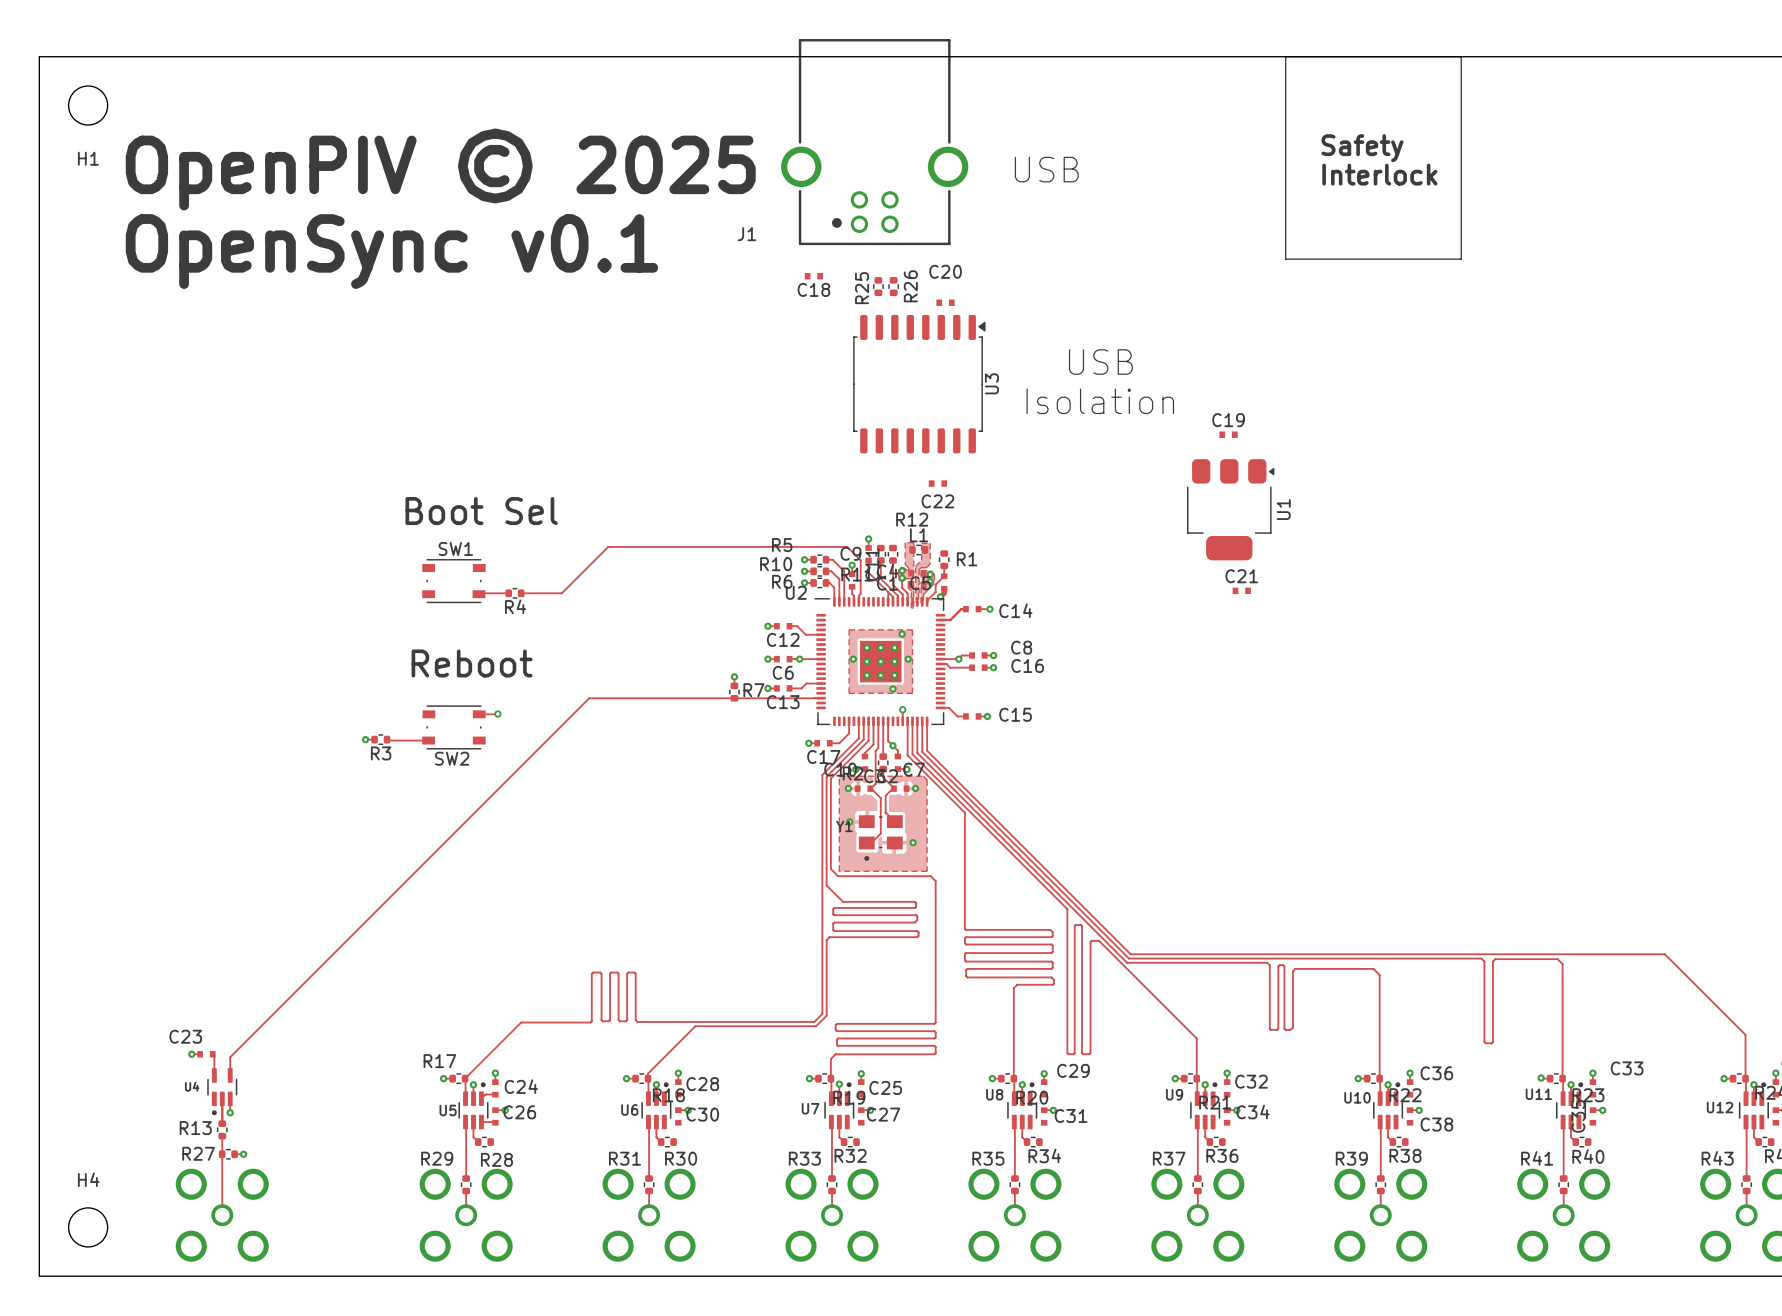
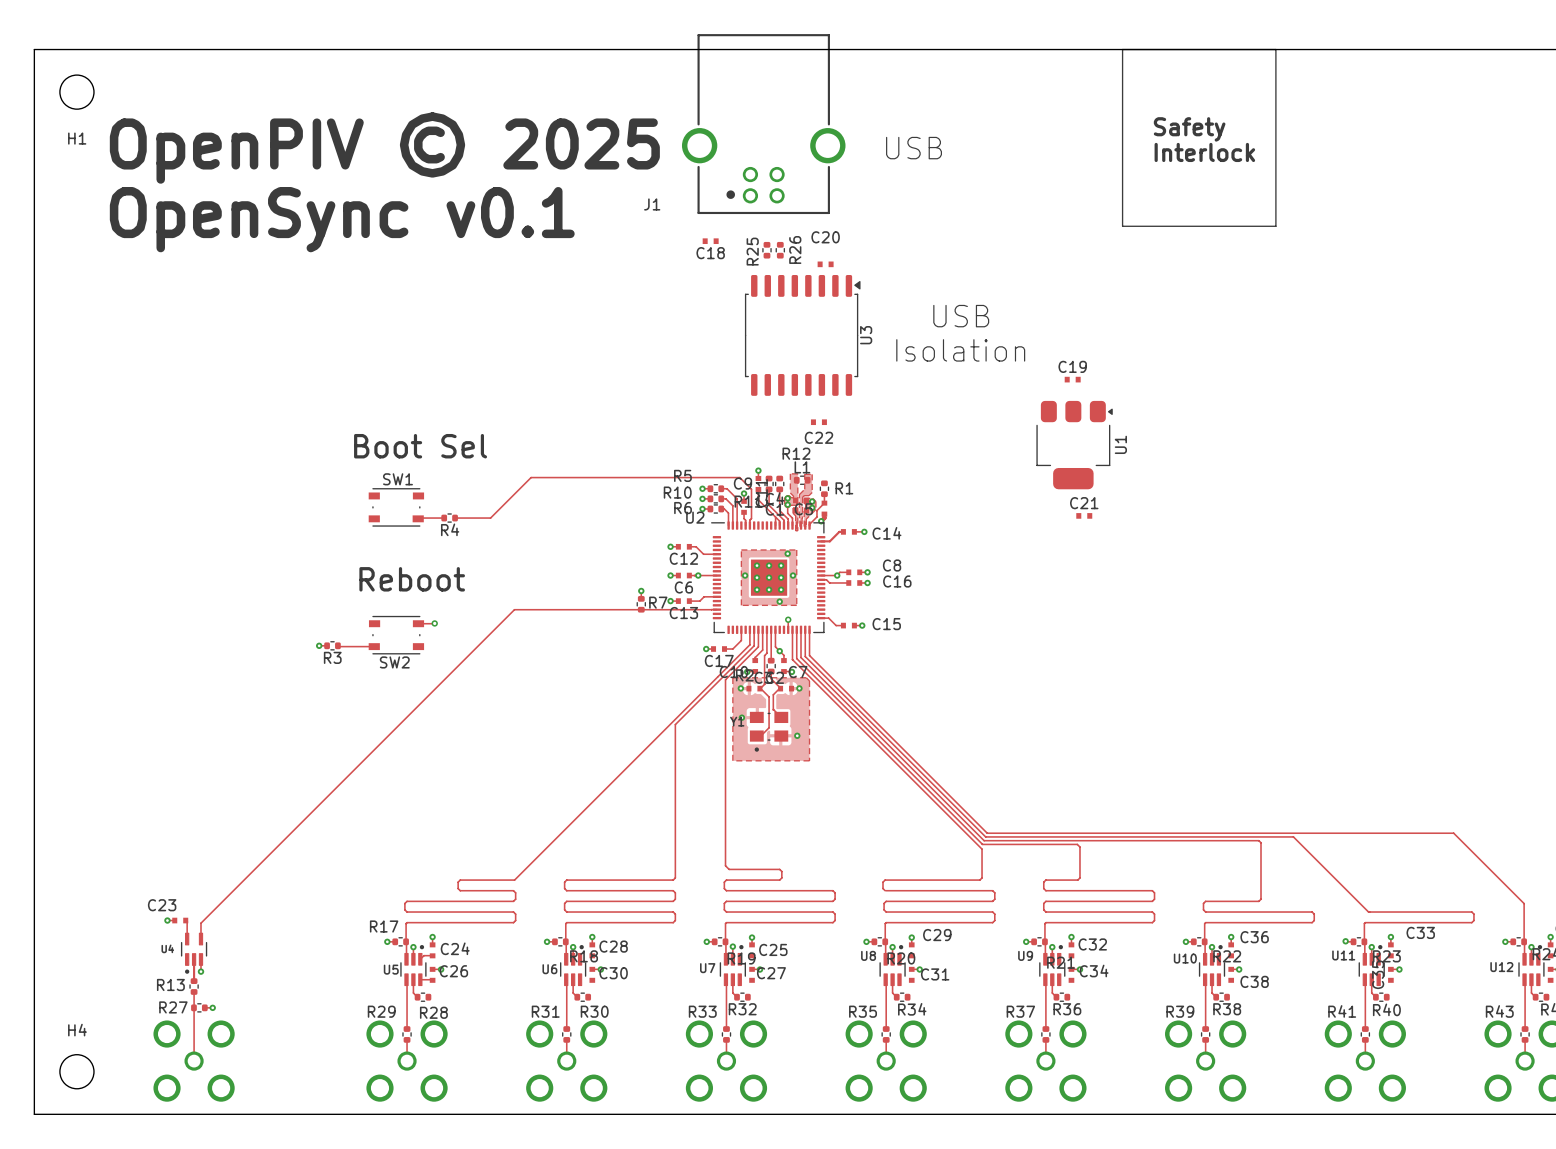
track: (822, 774) (822, 1013) (814, 1021) (637, 1021) (635, 1020) (634, 972) (627, 973) (627, 1020) (618, 1020) (618, 973) (611, 972) (610, 1020) (602, 1021) (601, 973) (592, 972) (590, 1022) (521, 1022) (465, 1078) -> (718, 676) (514, 880) (460, 880) (458, 882) (458, 888) (460, 890) (513, 890) (515, 892) (515, 899) (513, 901) (407, 901) (404, 903) (404, 909) (407, 912) (513, 912) (515, 914) (515, 920) (513, 922) (407, 922) (406, 941)
track: (826, 776) (826, 885) (842, 901) (916, 903) (914, 907) (834, 907) (833, 914) (917, 916) (914, 922) (834, 922) (833, 929) (917, 931) (918, 935) (829, 937) (826, 940) (826, 1015) (816, 1026) (695, 1026) (647, 1073) -> (721, 678) (675, 724) (675, 877) (673, 880) (566, 880) (564, 882) (564, 888) (566, 890) (673, 890) (675, 892) (675, 899) (673, 901) (566, 901) (564, 903) (564, 909) (566, 912) (673, 912) (675, 914) (675, 920) (673, 922) (566, 922) (565, 937)
track: (964, 812) (964, 928) (1050, 929) (1052, 932) (1051, 937) (964, 938) (966, 944) (1052, 945) (1051, 953) (964, 954) (966, 961) (1052, 962) (1051, 968) (966, 970) (967, 977) (1051, 977) (1053, 979) (1052, 984) (1017, 984) (1013, 988) (1013, 1057) -> (842, 709) (982, 849) (982, 877) (979, 880) (885, 880) (882, 882) (882, 888) (885, 890)
track: (830, 869) (838, 876) (930, 876) (935, 881) (935, 1022) (835, 1025) (836, 1031) (934, 1031) (934, 1038) (838, 1038) (836, 1044) (934, 1045) (935, 1053) (835, 1054) (830, 1059) -> (725, 758) (725, 865) (729, 869) (779, 869) (781, 871) (781, 877) (779, 880) (726, 880) (724, 882) (724, 888) (726, 890) (832, 890) (835, 892) (835, 899) (832, 901) (726, 901) (724, 903) (724, 909) (726, 912) (832, 912) (835, 914) (835, 920) (832, 922) (726, 922) (725, 924)
track: (1067, 909) (1068, 1054) (1074, 1053) (1074, 926) (1082, 926) (1083, 1054) (1090, 1053) (1090, 942) (1099, 940) -> (931, 793) (959, 821)
track: (1484, 961) (1485, 1043) (1492, 1042) (1492, 961) (1495, 959) (1557, 959) (1562, 964) (1562, 1057) -> (1296, 839) (1368, 912) (1471, 912) (1473, 914) (1473, 920) (1471, 922) (1364, 923)
track: (1267, 962) (1269, 965) (1271, 1029) (1278, 1028) (1279, 965) (1284, 966) (1285, 1029) (1290, 1029) (1292, 1027) (1292, 971) (1295, 968) (1373, 968) (1379, 975) (1379, 1057) -> (1106, 840) (1258, 840) (1261, 842) (1261, 899) (1258, 901) (1205, 901) (1203, 903) (1203, 909) (1205, 912) (1312, 912) (1314, 914) (1314, 920) (1312, 922) (1204, 923)
track: (1124, 966) (1196, 1038) (1196, 1057) -> (982, 843) (1077, 844) (1079, 847) (1079, 877) (1077, 880) (1045, 880) (1043, 882) (1043, 888) (1045, 890) (1152, 890) (1154, 892) (1154, 899) (1152, 901) (1045, 901) (1043, 903) (1043, 909) (1045, 912) (1152, 912) (1154, 914) (1154, 920) (1152, 922) (1044, 923)
track: none -> (886, 890) (992, 890) (994, 892) (994, 899) (992, 901) (886, 901) (884, 903) (884, 909) (886, 912) (992, 912) (994, 914) (994, 920) (992, 922) (885, 923)

